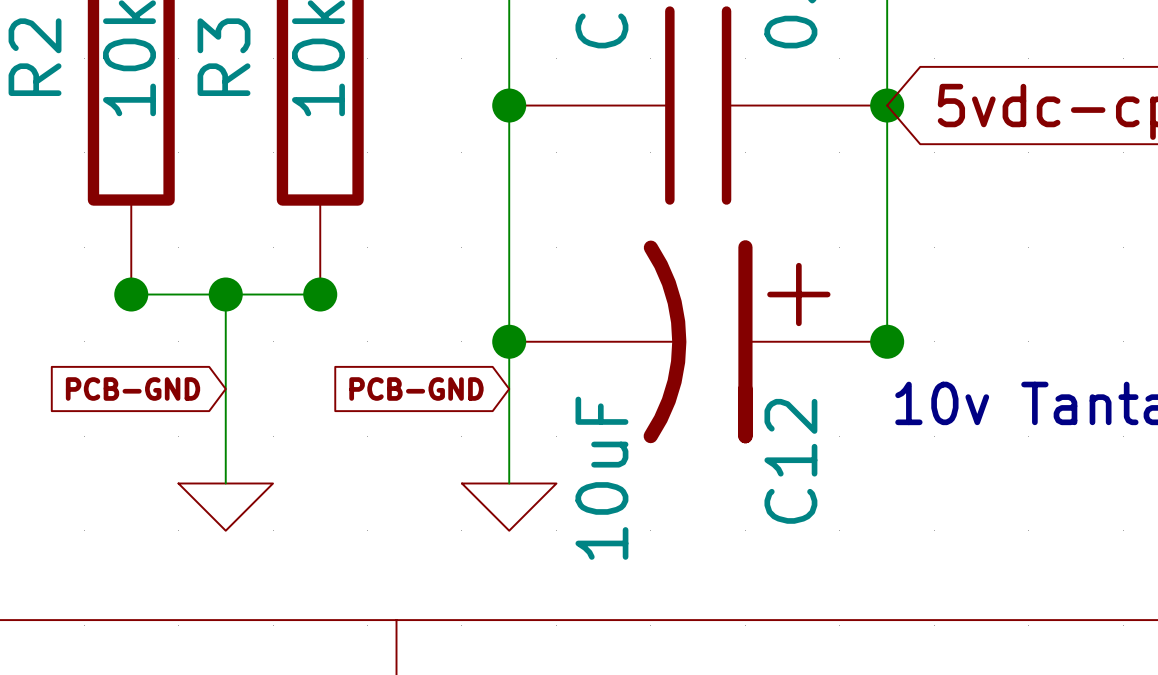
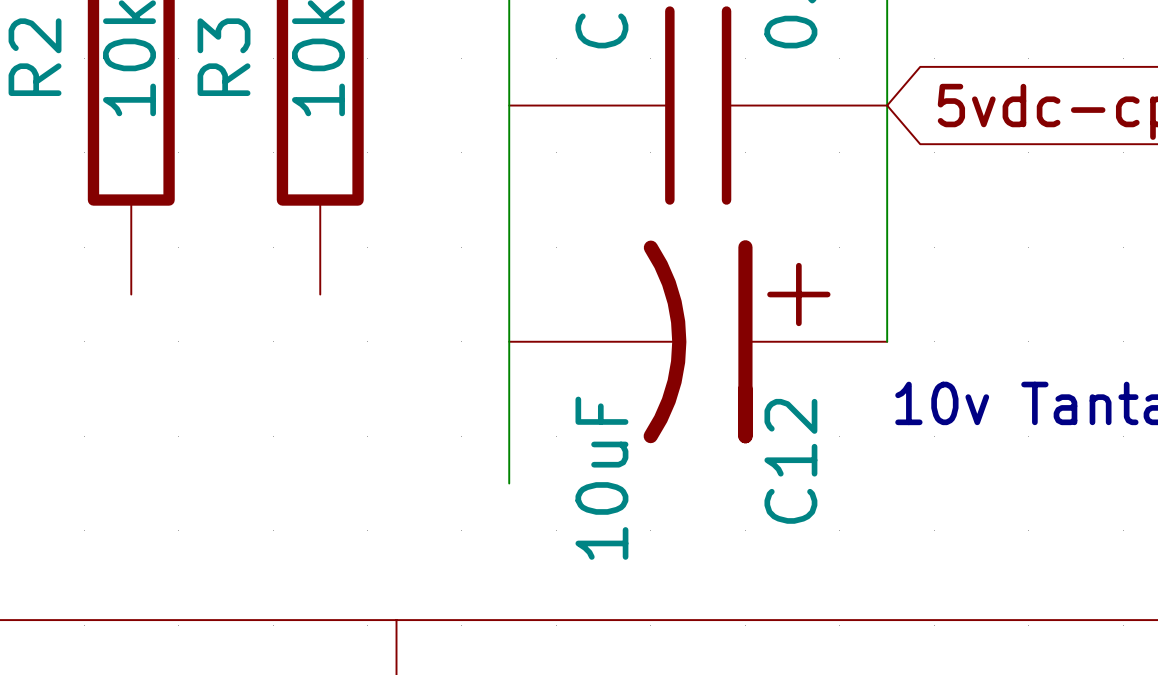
junction: (509, 105) -> none
junction: (887, 105) -> none
wire: (131, 294) (320, 294) -> none
junction: (131, 294) -> none
wire: (225, 294) (225, 483) -> none
junction: (225, 294) -> none
junction: (320, 294) -> none
junction: (509, 341) -> none
junction: (887, 341) -> none
global label: PCB-GND (133, 389) -> none
global label: PCB-GND (416, 389) -> none
power symbol: (225, 507) -> none
power symbol: (509, 507) -> none

